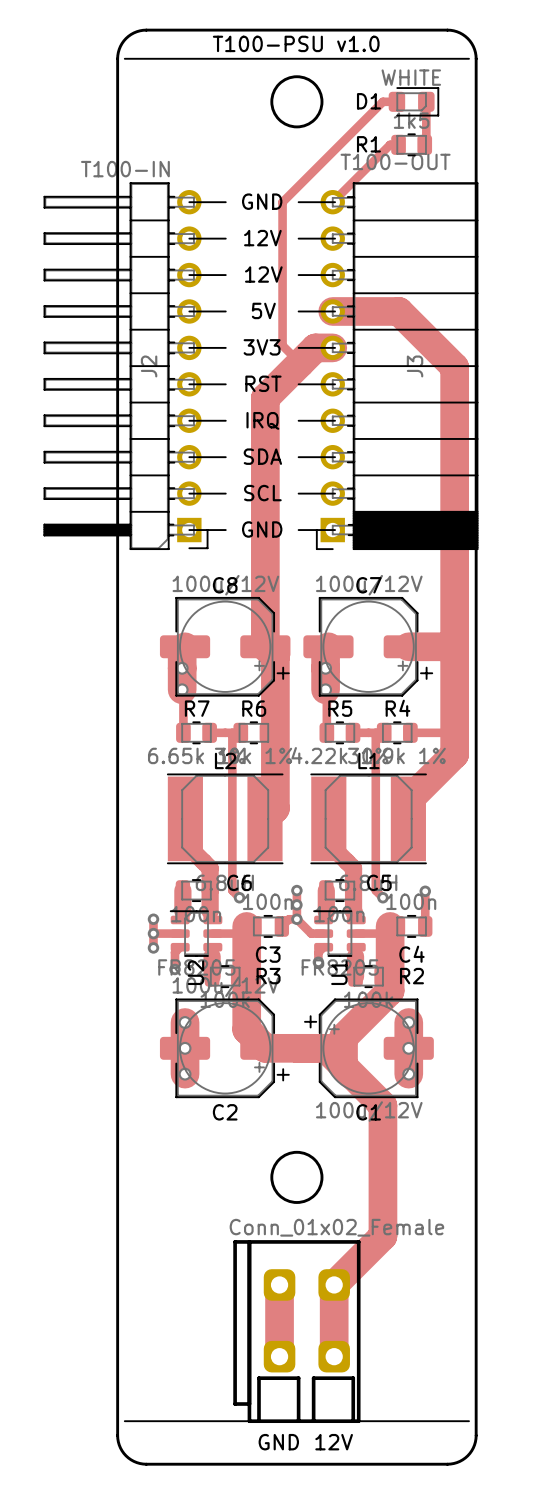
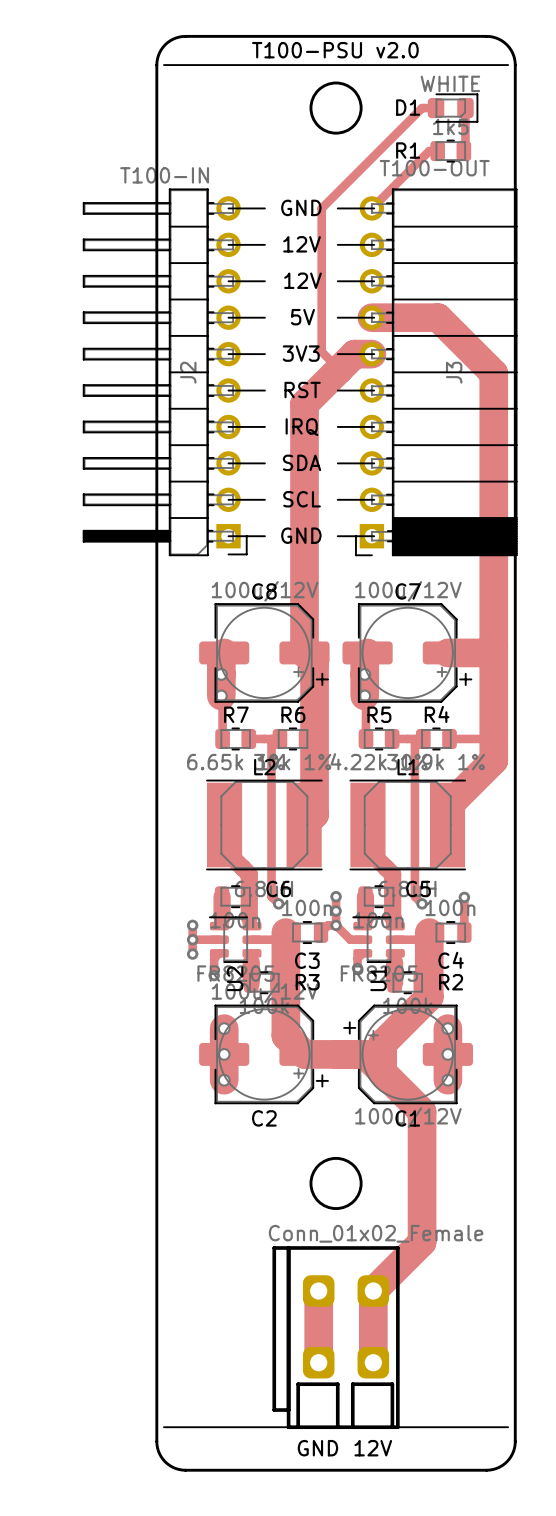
text: T100-PSU v1.0 (296, 43) -> T100-PSU v2.0 (335, 50)

